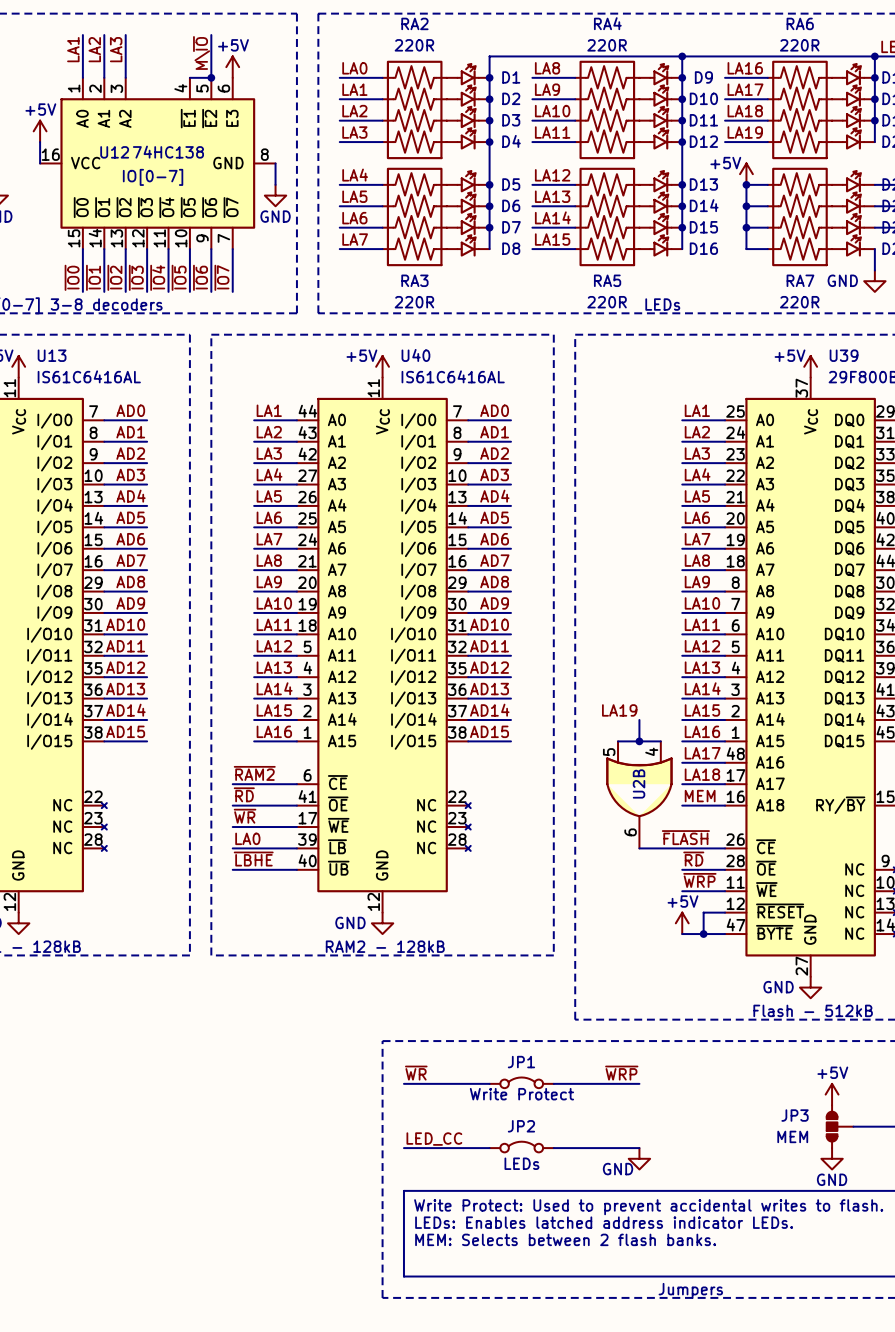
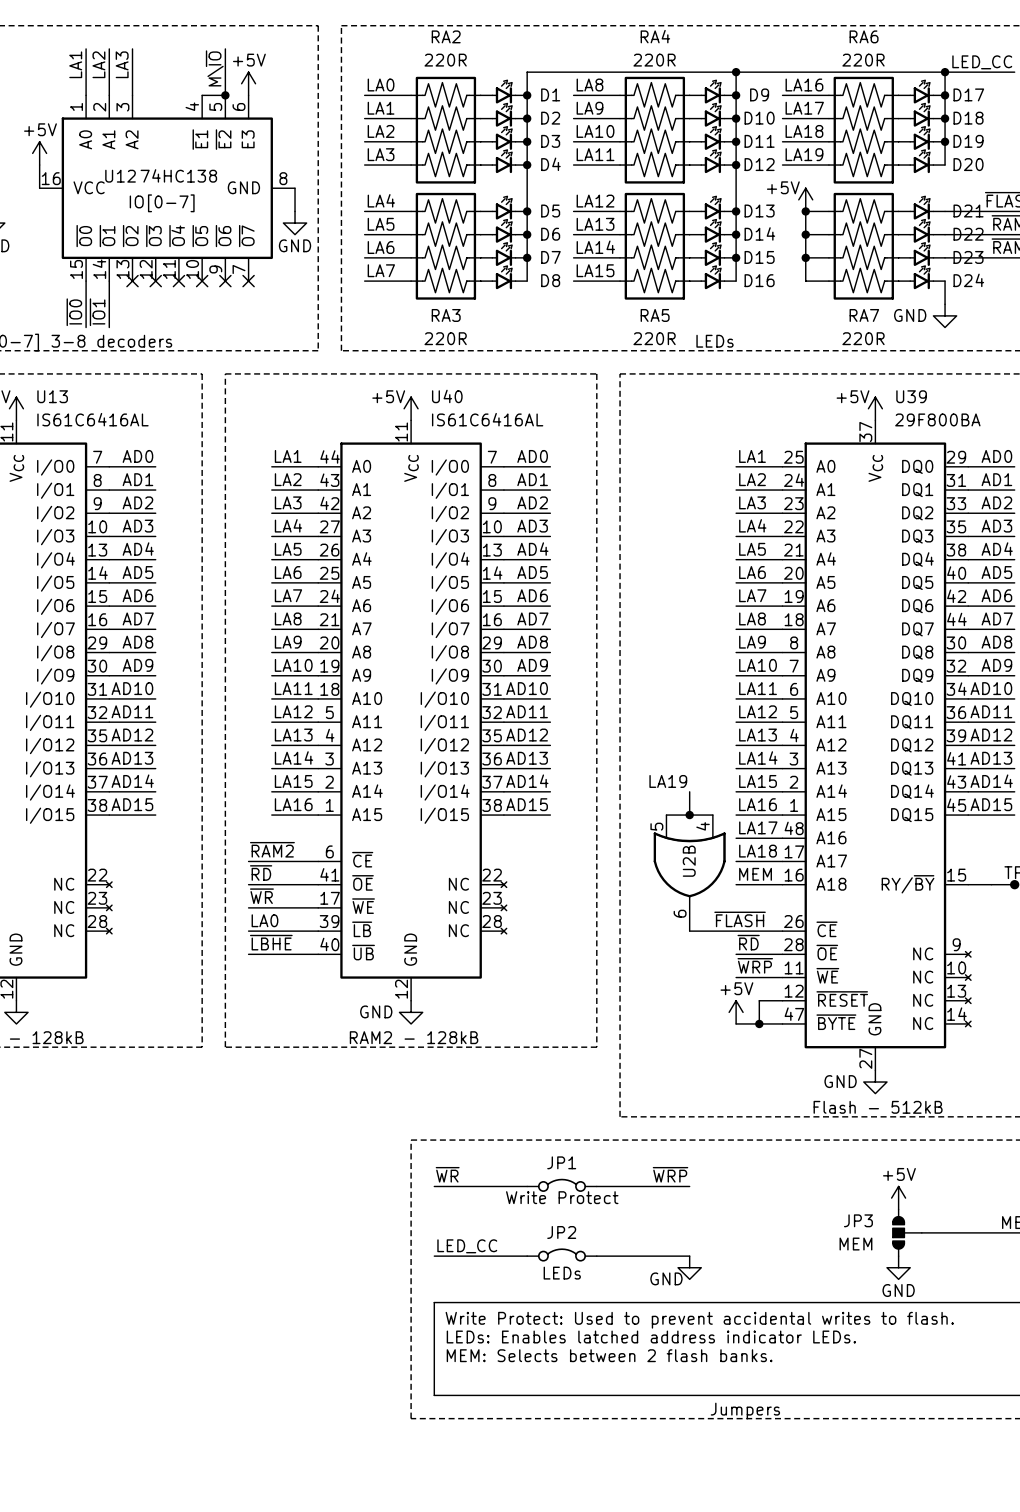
wire: (125, 249) (125, 291) -> none
no-connect mark: none -> (132, 281)
wire: (147, 249) (147, 291) -> none
no-connect mark: none -> (155, 281)
wire: (168, 249) (168, 291) -> none
no-connect mark: none -> (178, 281)
wire: (189, 249) (189, 291) -> none
no-connect mark: none -> (202, 281)
wire: (211, 249) (211, 291) -> none
no-connect mark: none -> (225, 281)
wire: (232, 249) (232, 291) -> none
no-connect mark: none -> (248, 281)
label: ~{IO2} (114, 277) -> none
label: ~{IO3} (136, 277) -> none
label: ~{IO4} (157, 277) -> none
label: ~{IO5} (179, 277) -> none
label: ~{IO6} (200, 277) -> none
label: ~{IO7} (221, 277) -> none

